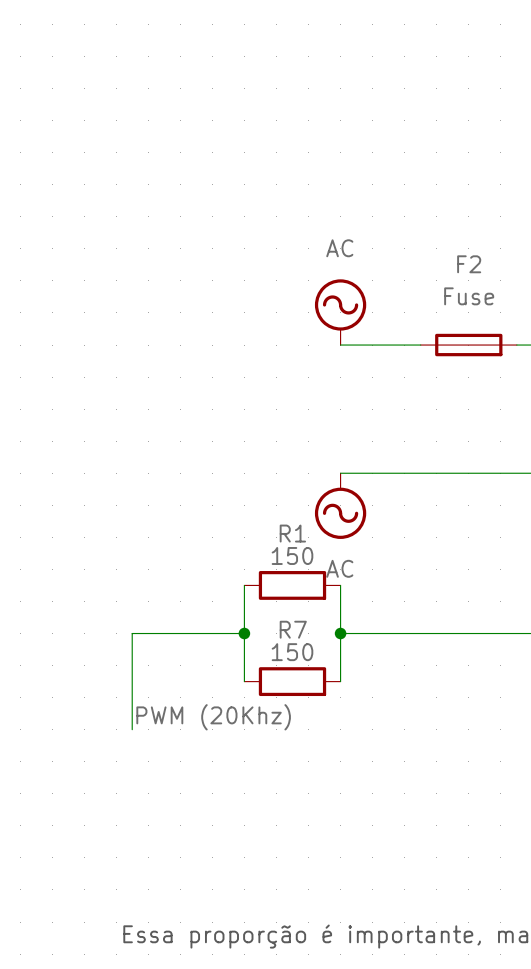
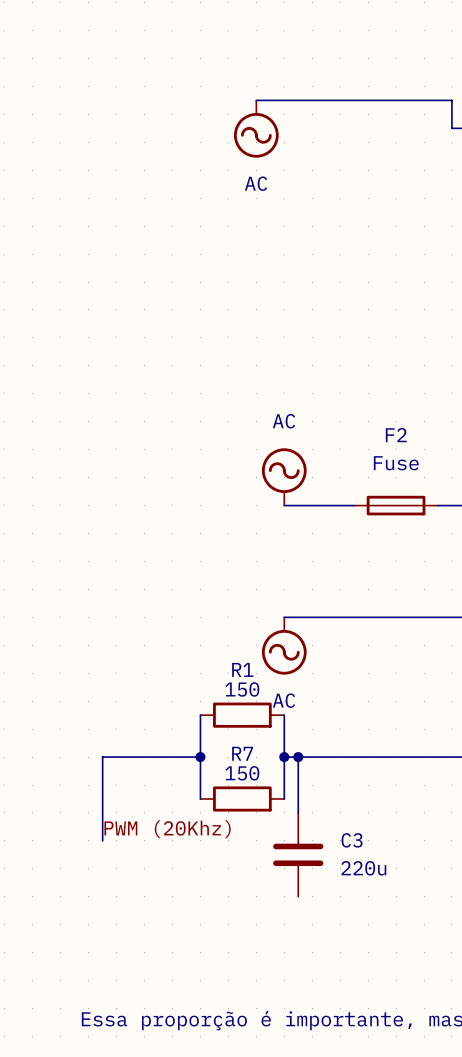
wire: none -> (298, 757) (298, 812)
junction: none -> (298, 757)
C3: none -> 220u (298, 854)

